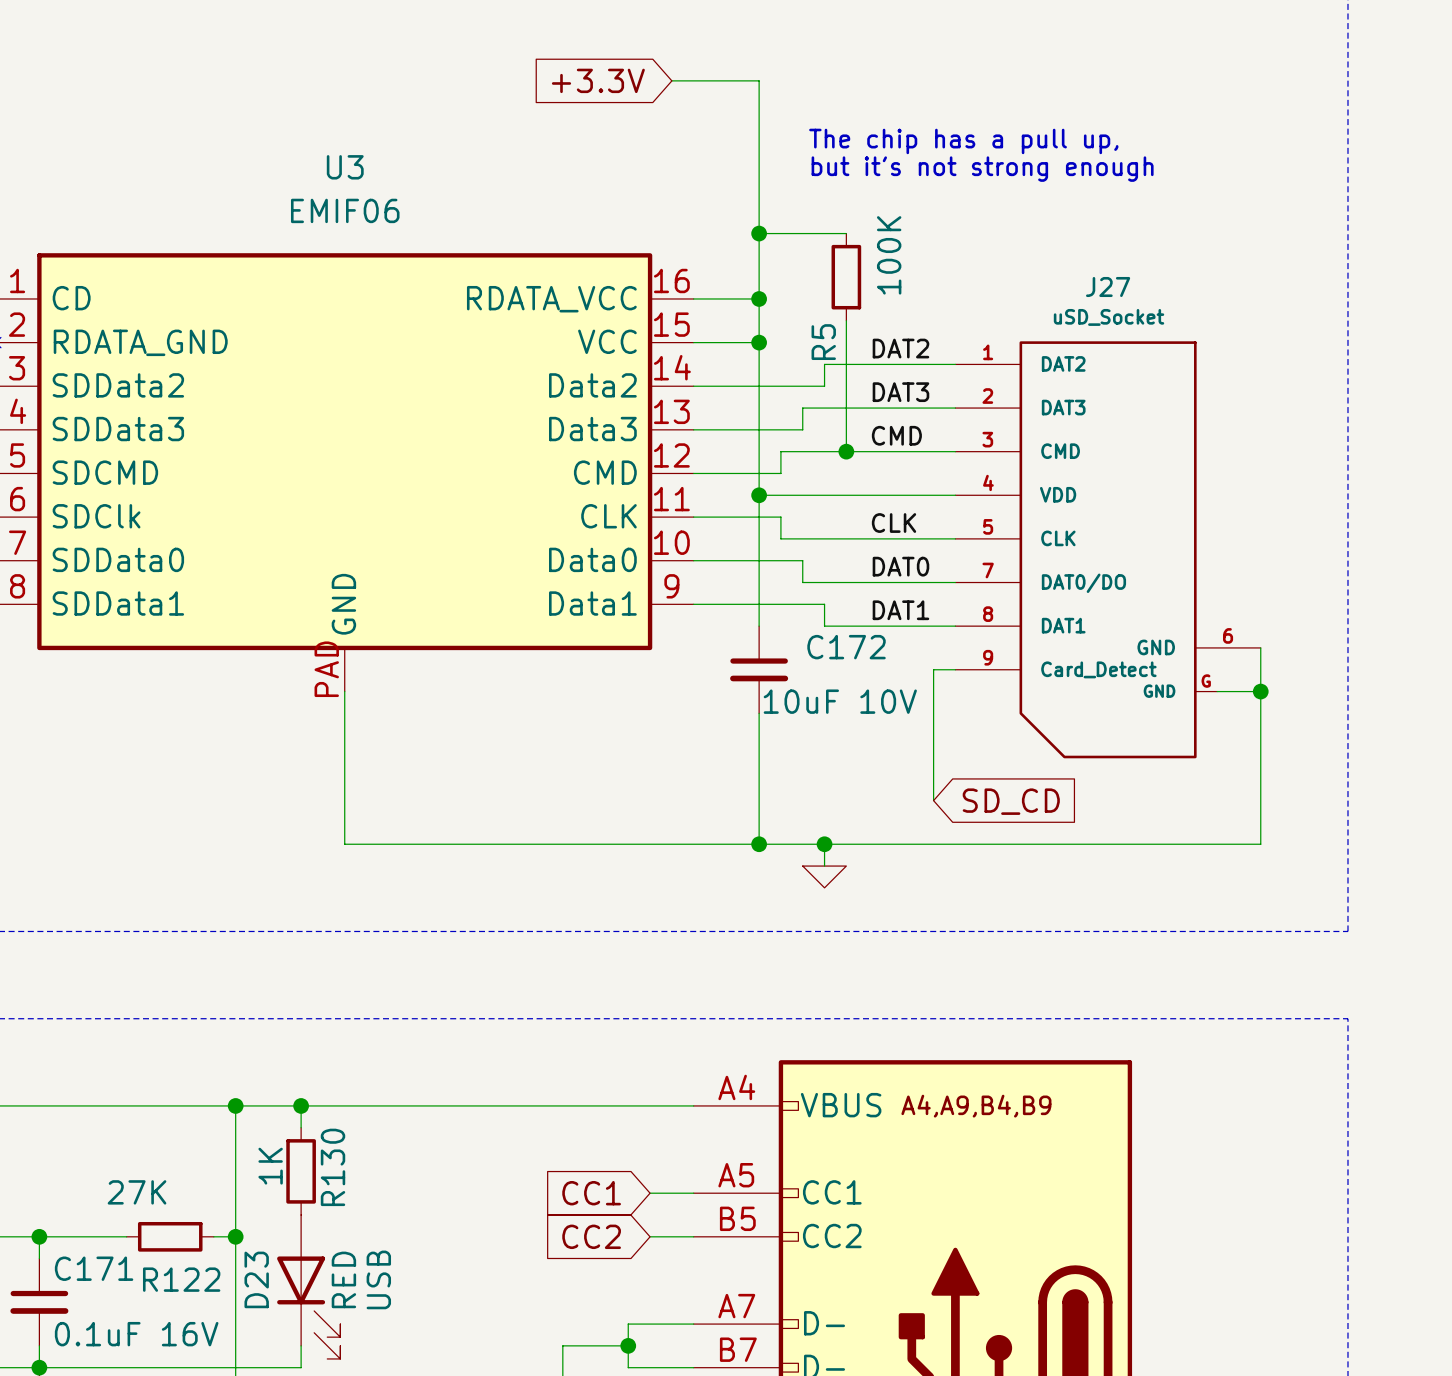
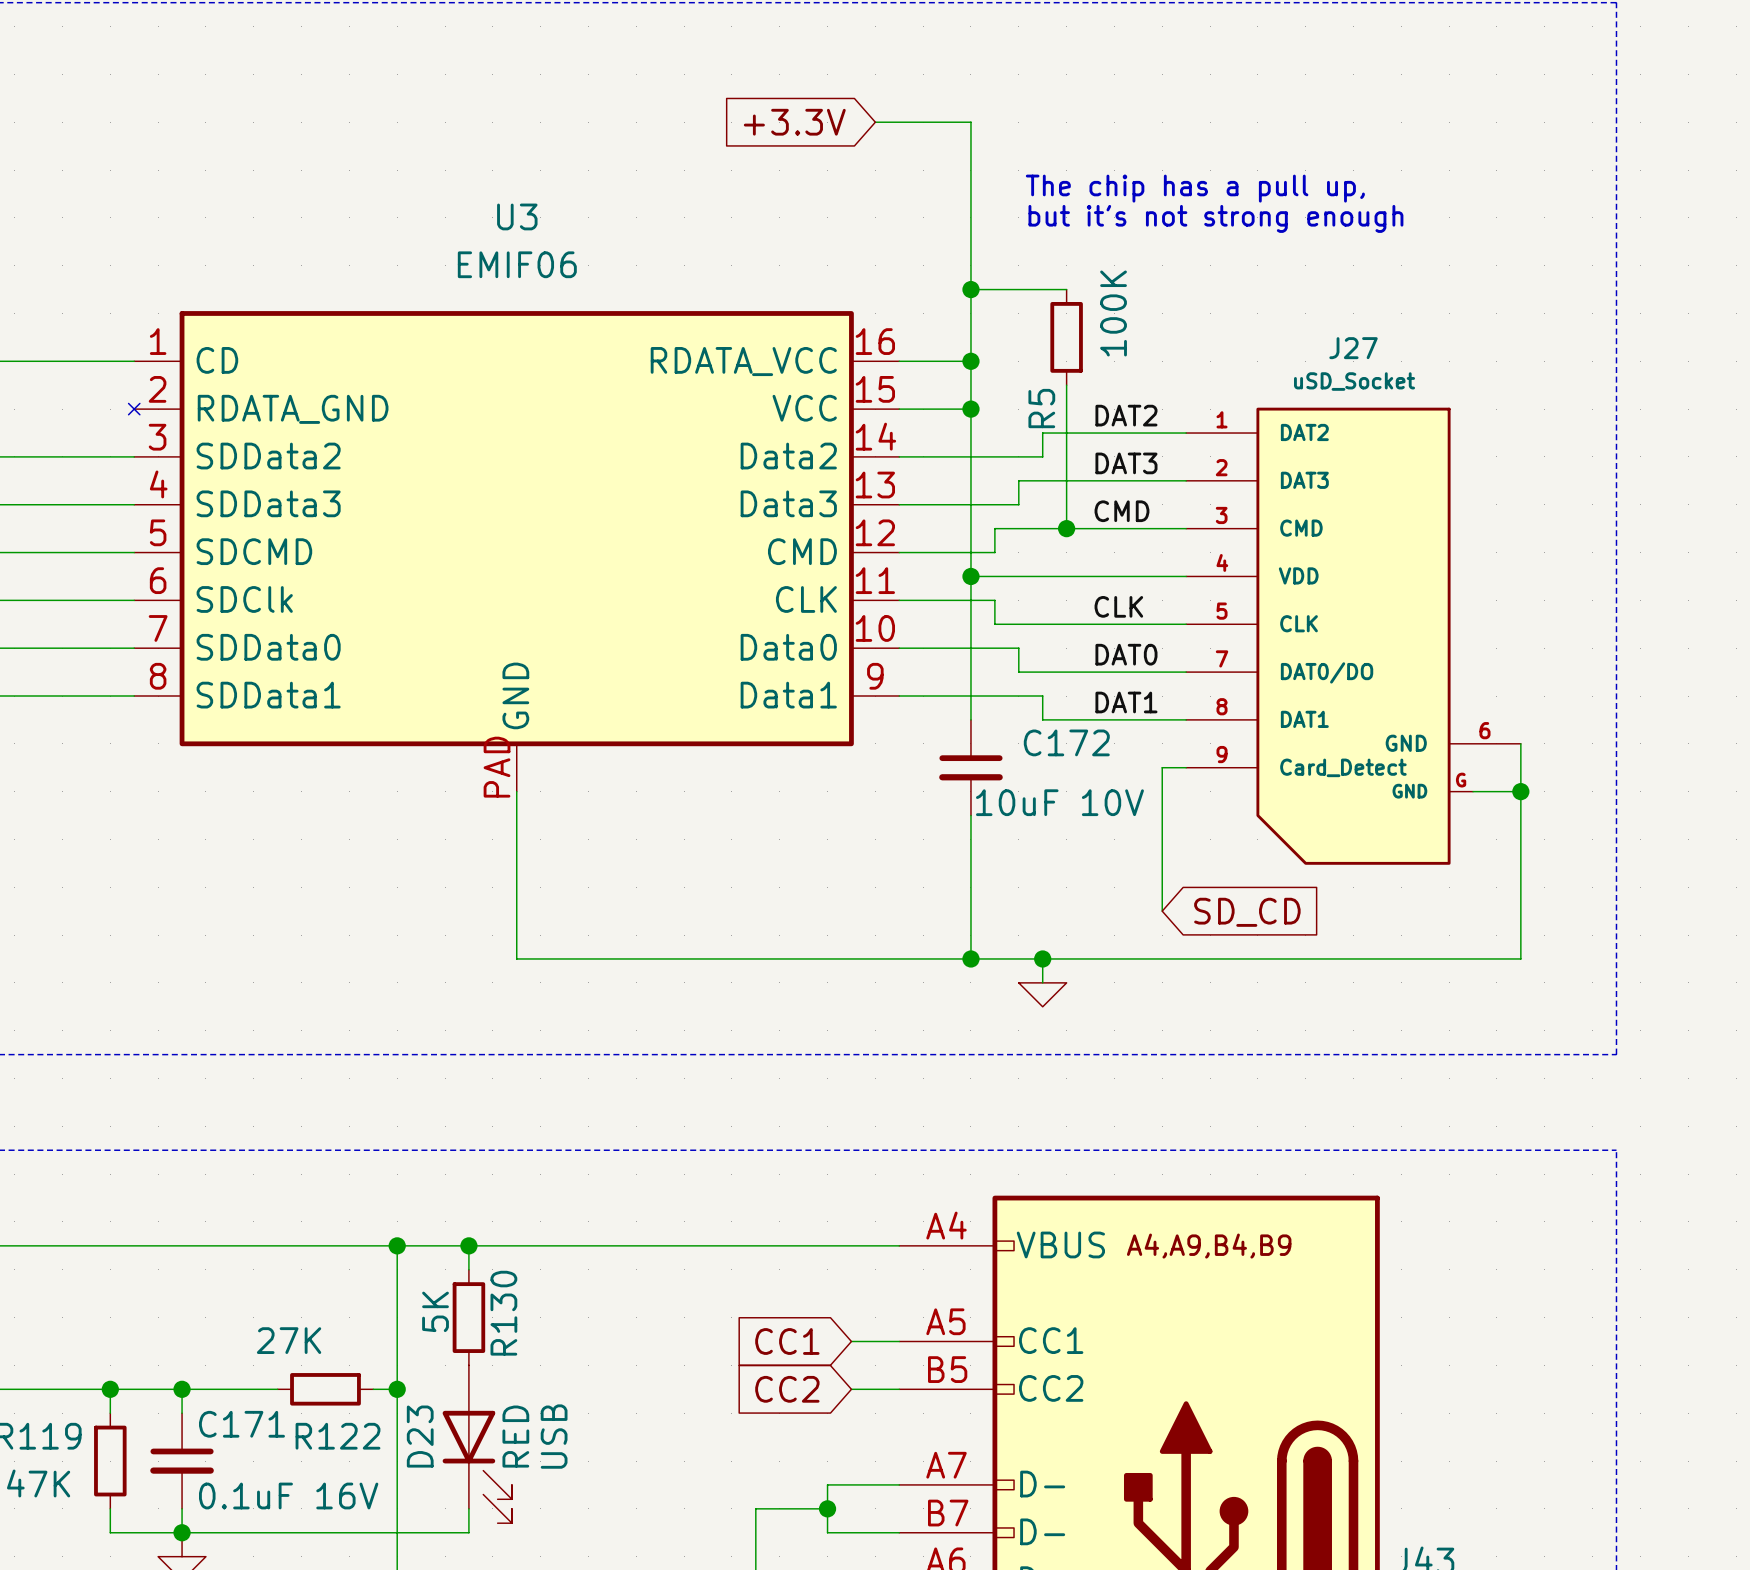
J27 symbol: [955, 341, 1261, 759] -> [1186, 407, 1521, 865]
R130 value: 1K (270, 1166) -> 5K (435, 1311)

